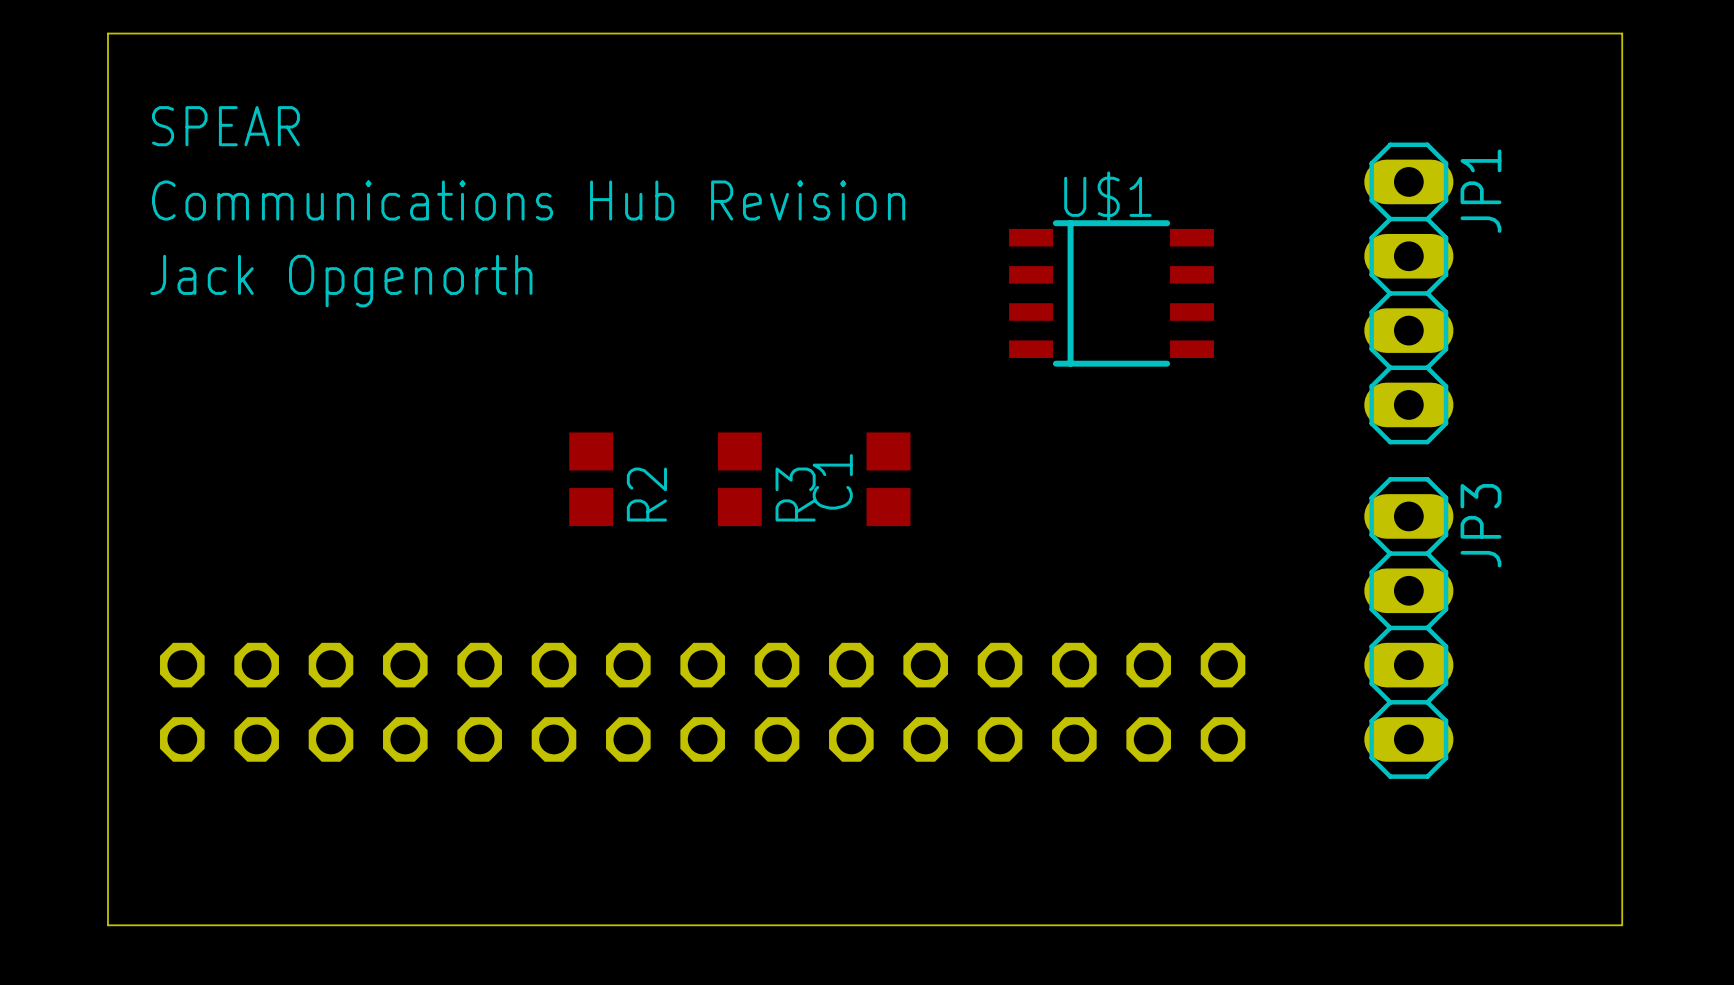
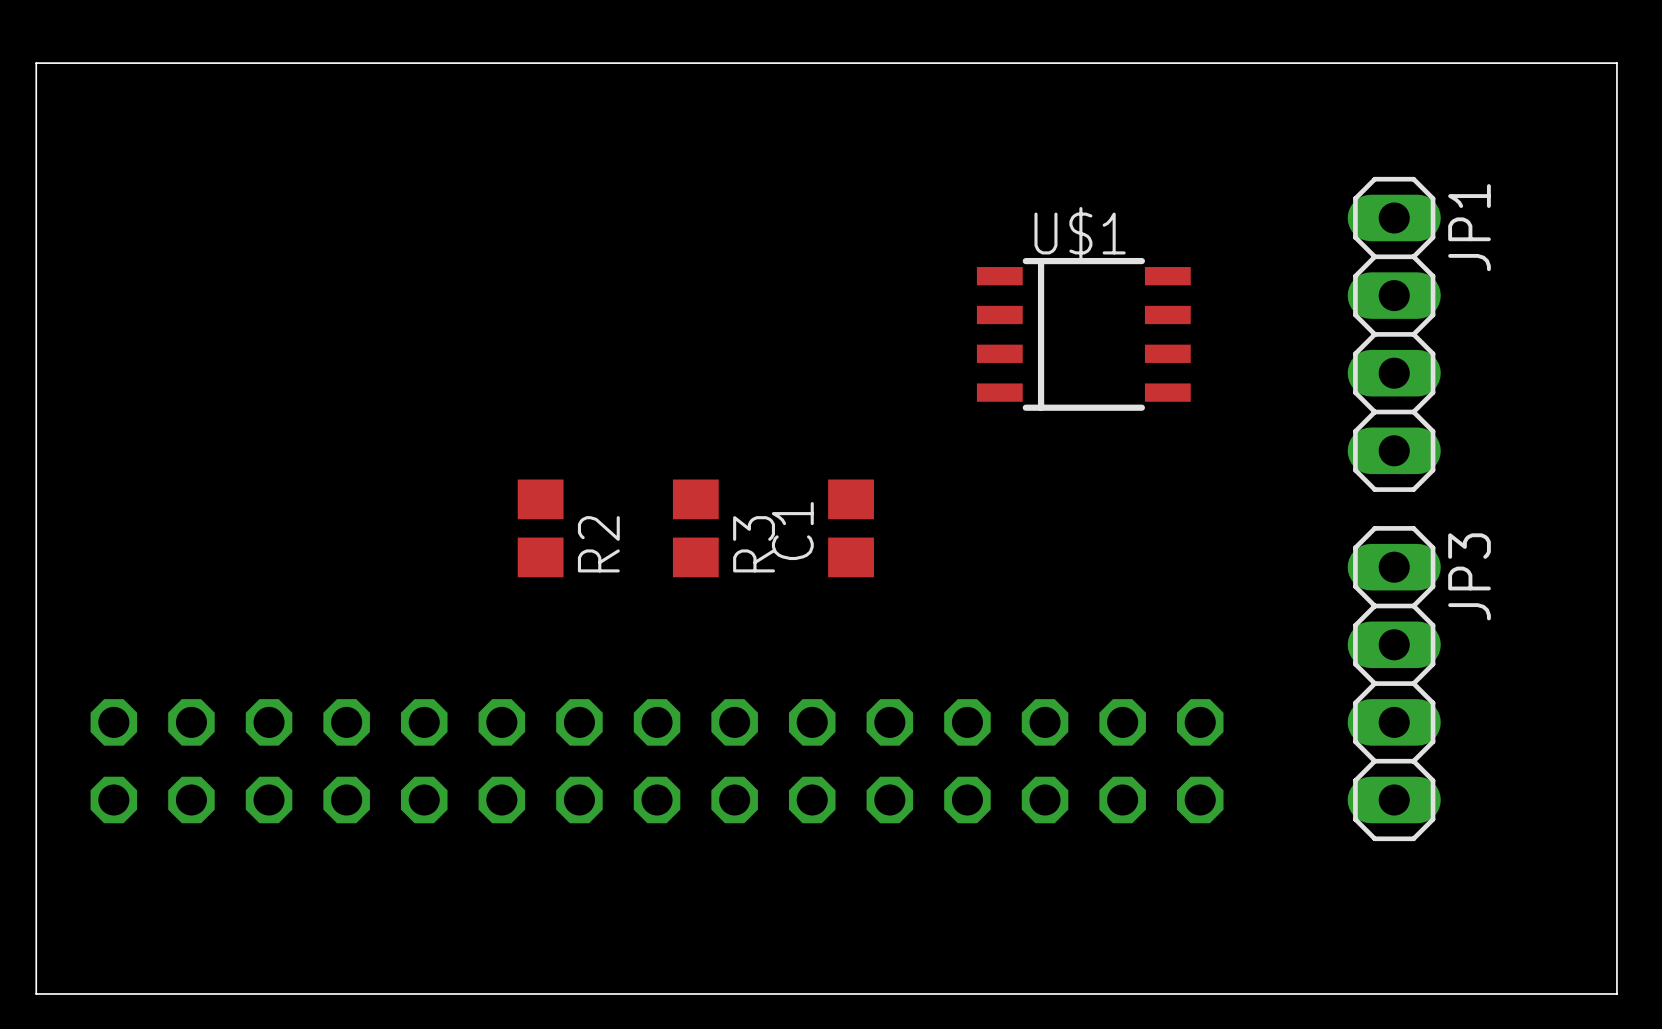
text: SPEAR (225, 126) -> none
text: Communications Hub Revision (528, 200) -> none
text: Jack Opgenorth (341, 281) -> none

